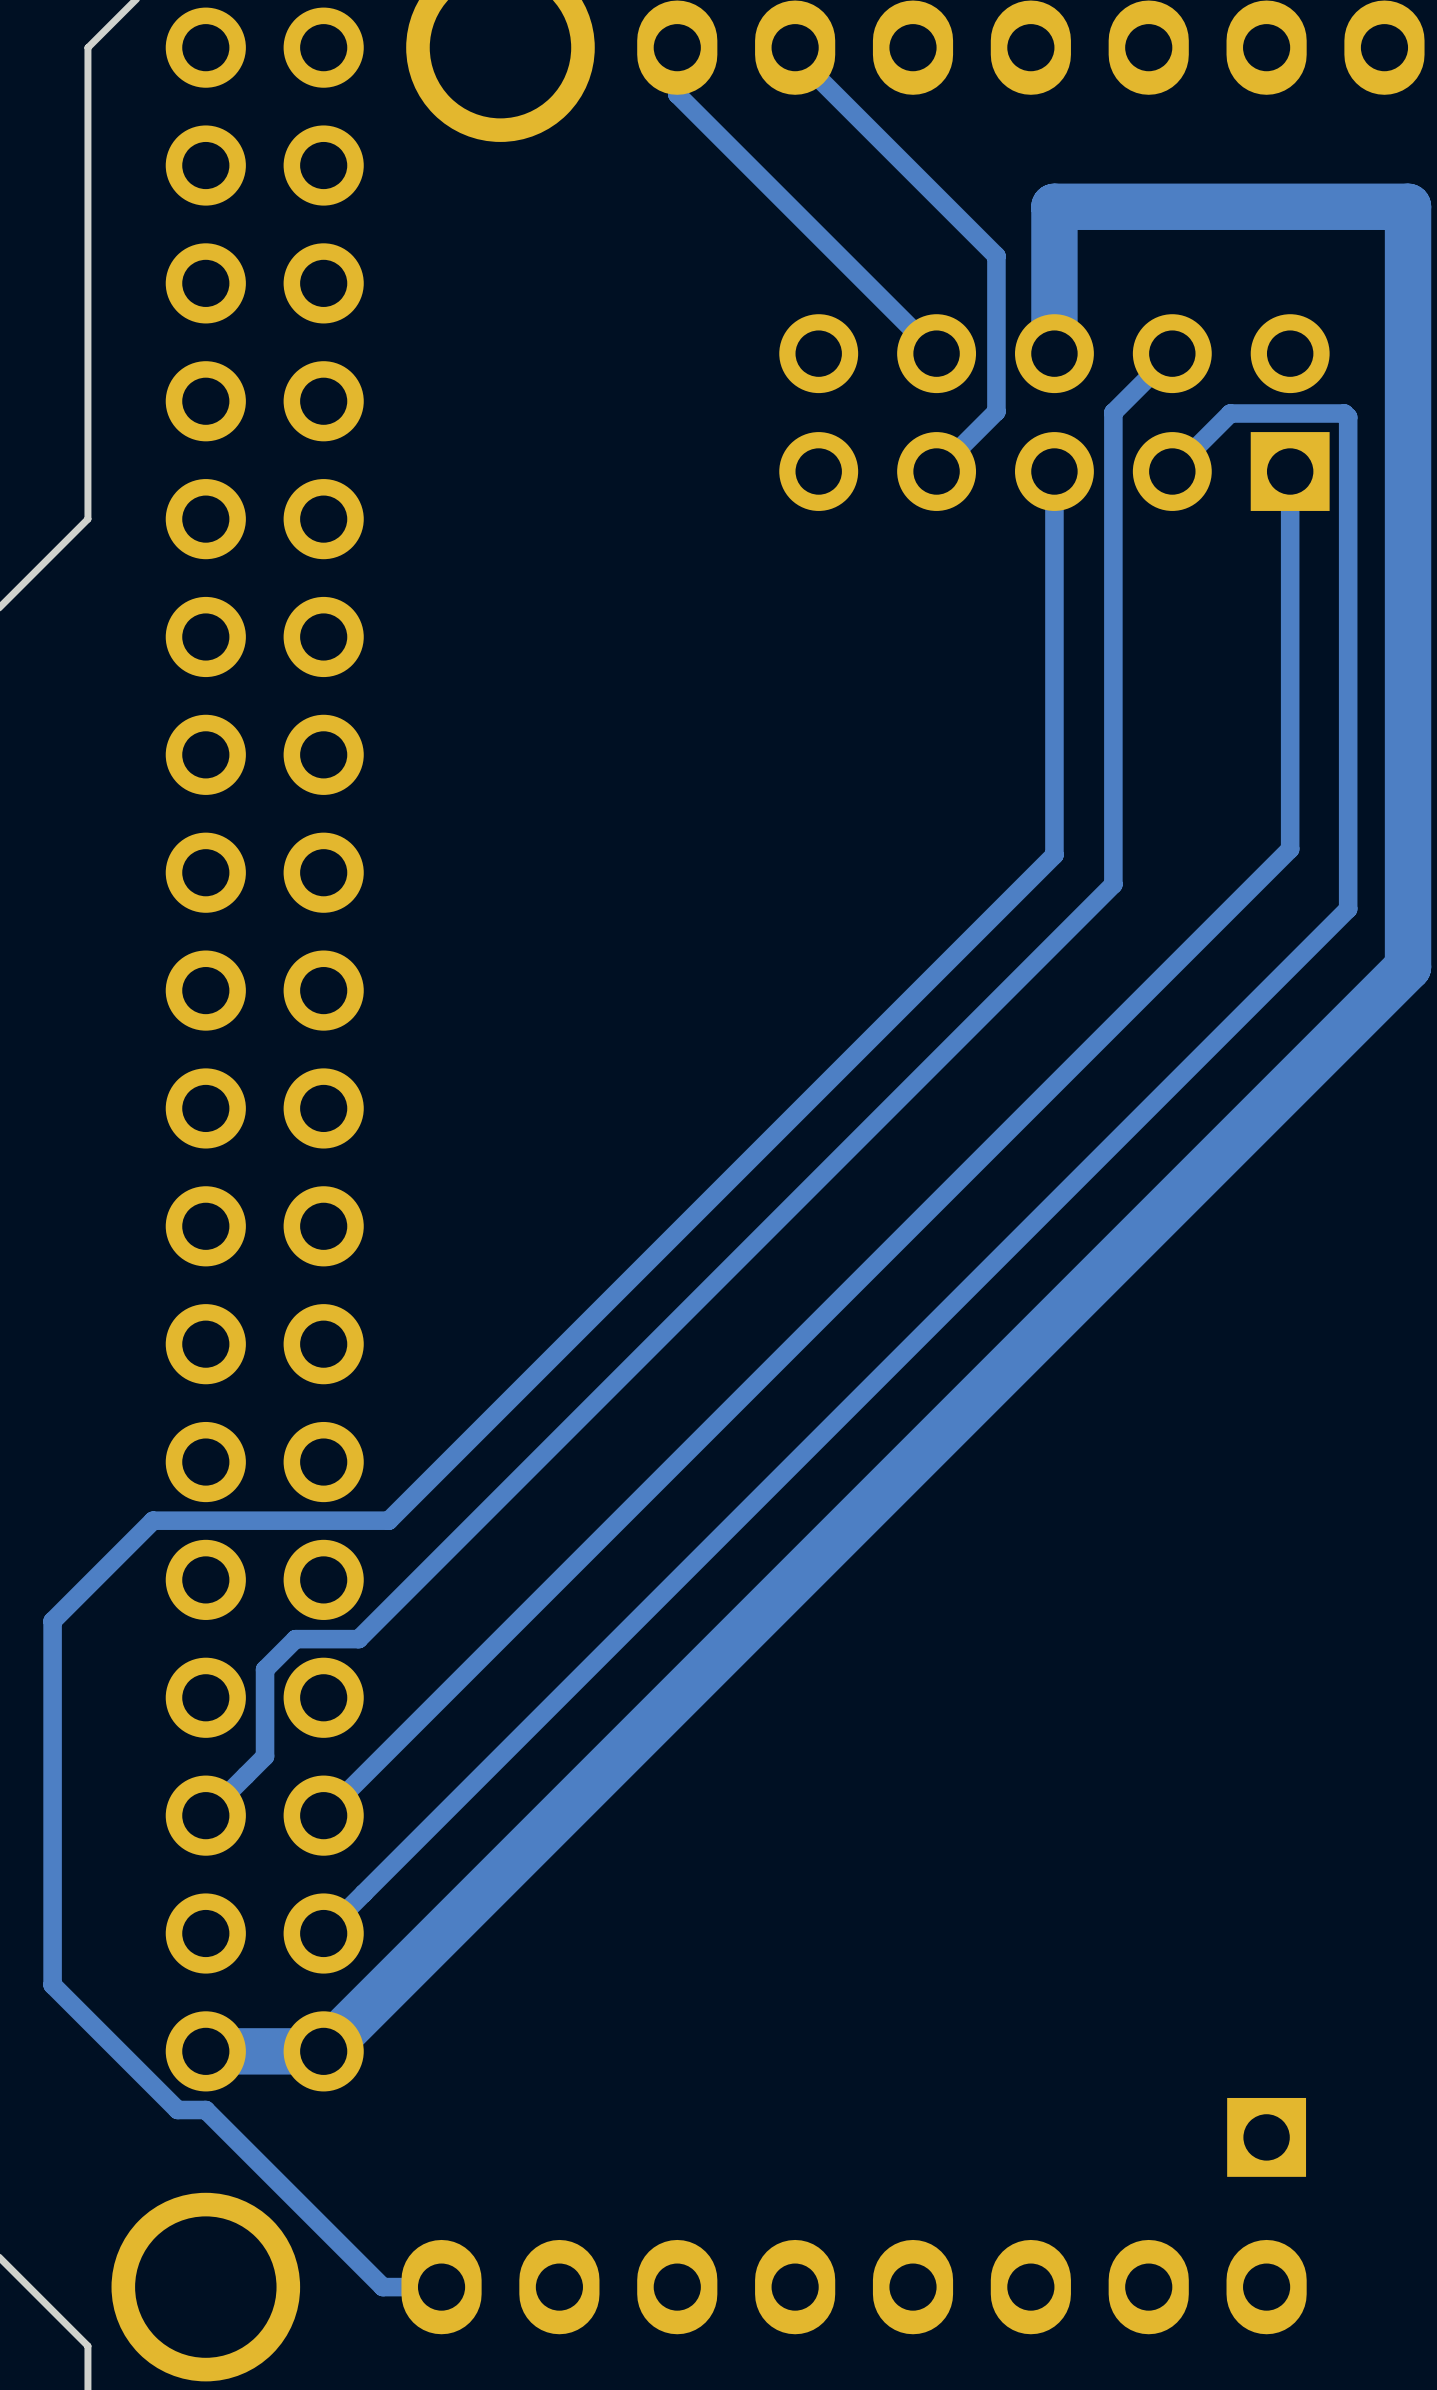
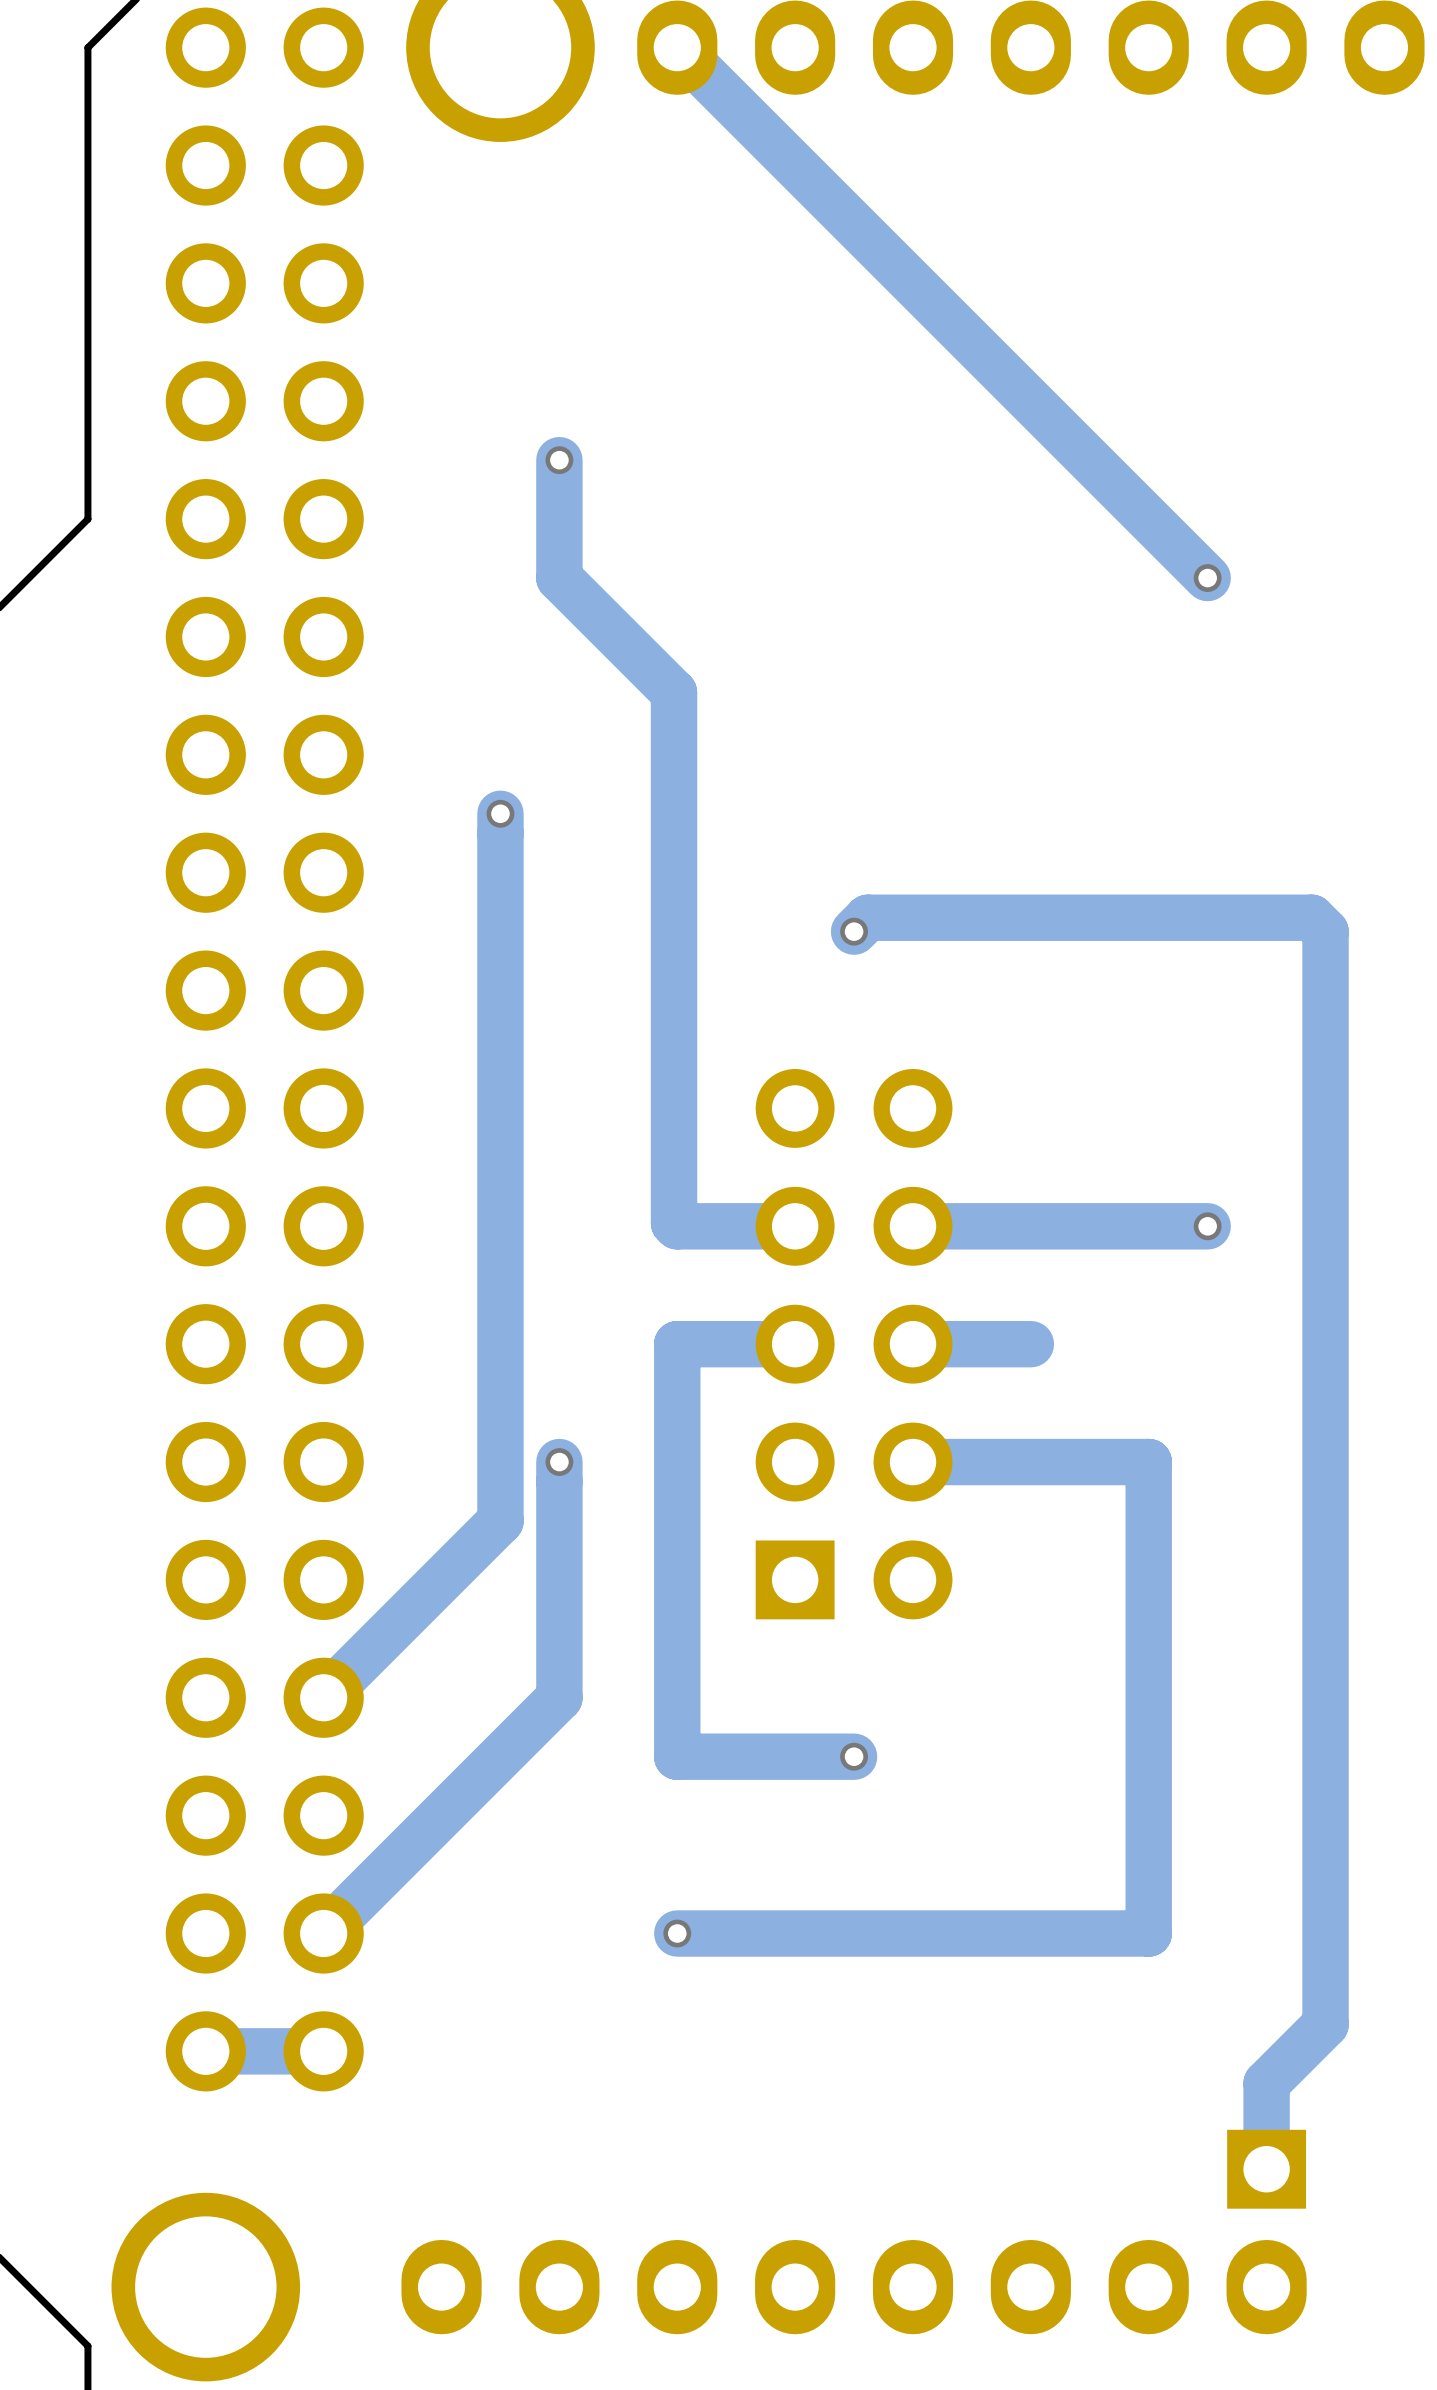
track: (677, 47) (677, 94) (936, 353) -> (677, 47) (1207, 578)
track: (795, 47) (795, 54) (996, 256) (996, 411) (936, 471) -> none
track: (1054, 353) (1054, 206) (1408, 206) (1408, 967) (323, 2051) -> none
track: (1172, 353) (1113, 412) (1113, 884) (358, 1639) (295, 1639) (265, 1669) (265, 1756) (205, 1815) -> none
part rotation: 0° (1054, 412) -> 90° clockwise (854, 1344)
part position: (1054, 412) -> (854, 1344)
track: none -> (559, 460) (559, 578) (674, 692) (674, 1223) (677, 1226) (795, 1226)
via: none -> (559, 460)
track: (1054, 471) (1054, 855) (388, 1520) (153, 1520) (52, 1621) (52, 1984) (177, 2110) (205, 2110) (382, 2287) (441, 2287) -> none
track: (1172, 471) (1230, 413) (1344, 413) (1348, 417) (1348, 909) (559, 1697) -> (559, 1462) (559, 1697)
track: (1290, 471) (1290, 849) (323, 1815) -> none
via: none -> (1207, 578)
track: none -> (500, 813) (500, 1520) (323, 1697)
via: none -> (500, 813)
track: none -> (854, 931) (867, 917) (1311, 917) (1325, 931) (1325, 2024) (1266, 2083) (1266, 2169)
via: none -> (854, 931)
track: none -> (1207, 1226) (913, 1226)
via: none -> (1207, 1226)
track: none -> (795, 1344) (677, 1344) (677, 1756) (854, 1756)
track: none -> (1030, 1344) (913, 1344)
via: none -> (559, 1462)
track: none -> (913, 1462) (1148, 1462) (1148, 1933) (677, 1933)
track width: thin (559, 1697) (323, 1933) -> thick (559, 1697) (323, 1933)
via: none -> (854, 1756)
via: none -> (677, 1933)
part position: (1266, 2137) -> (1266, 2169)

